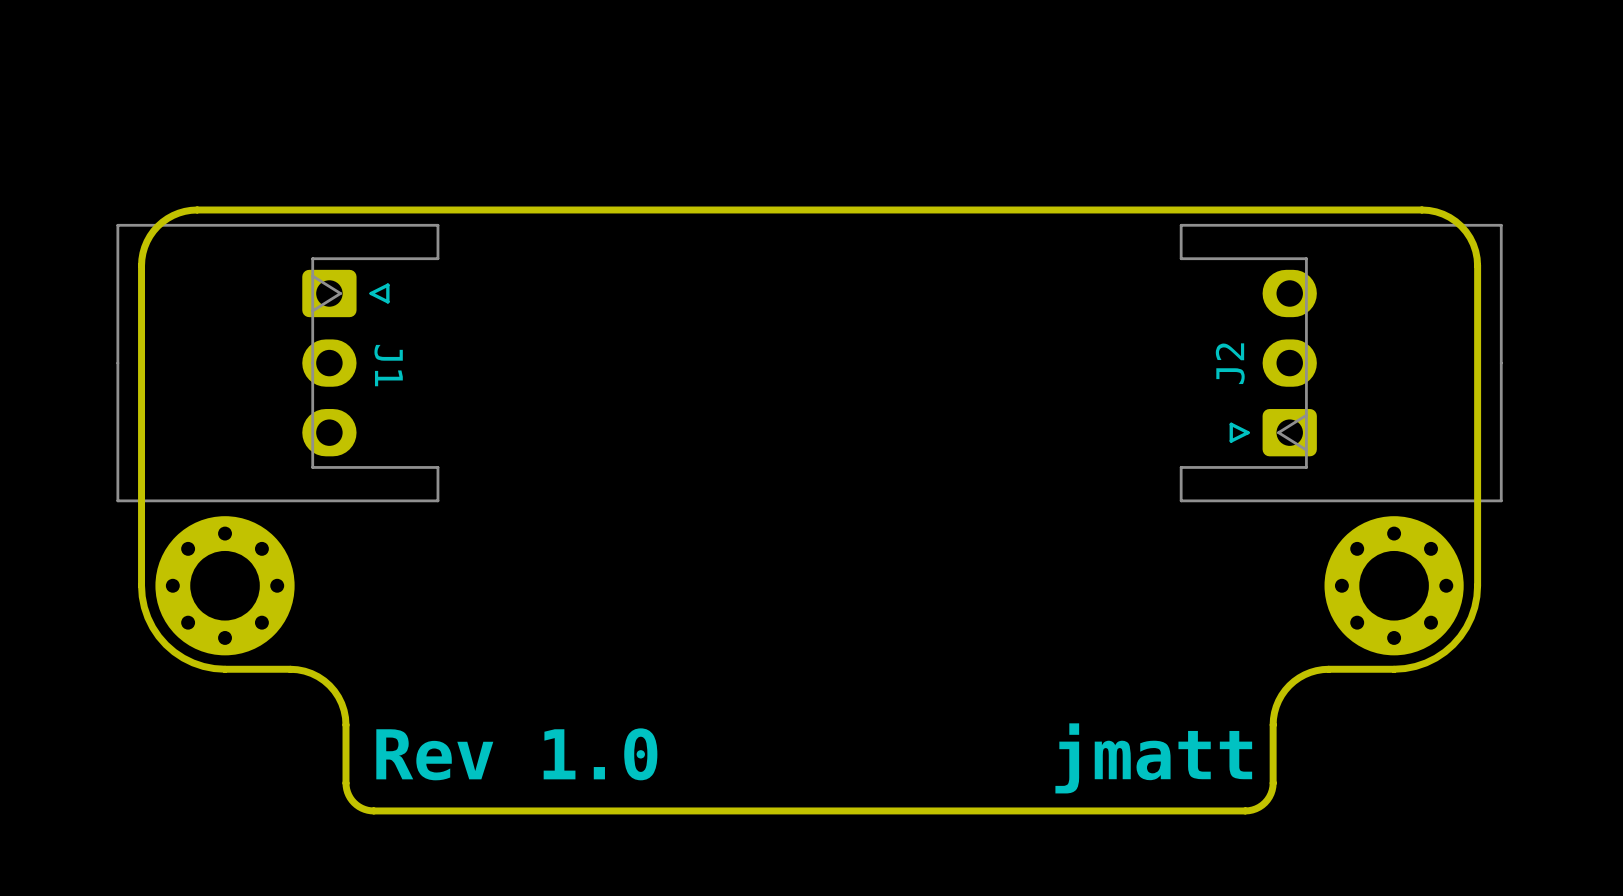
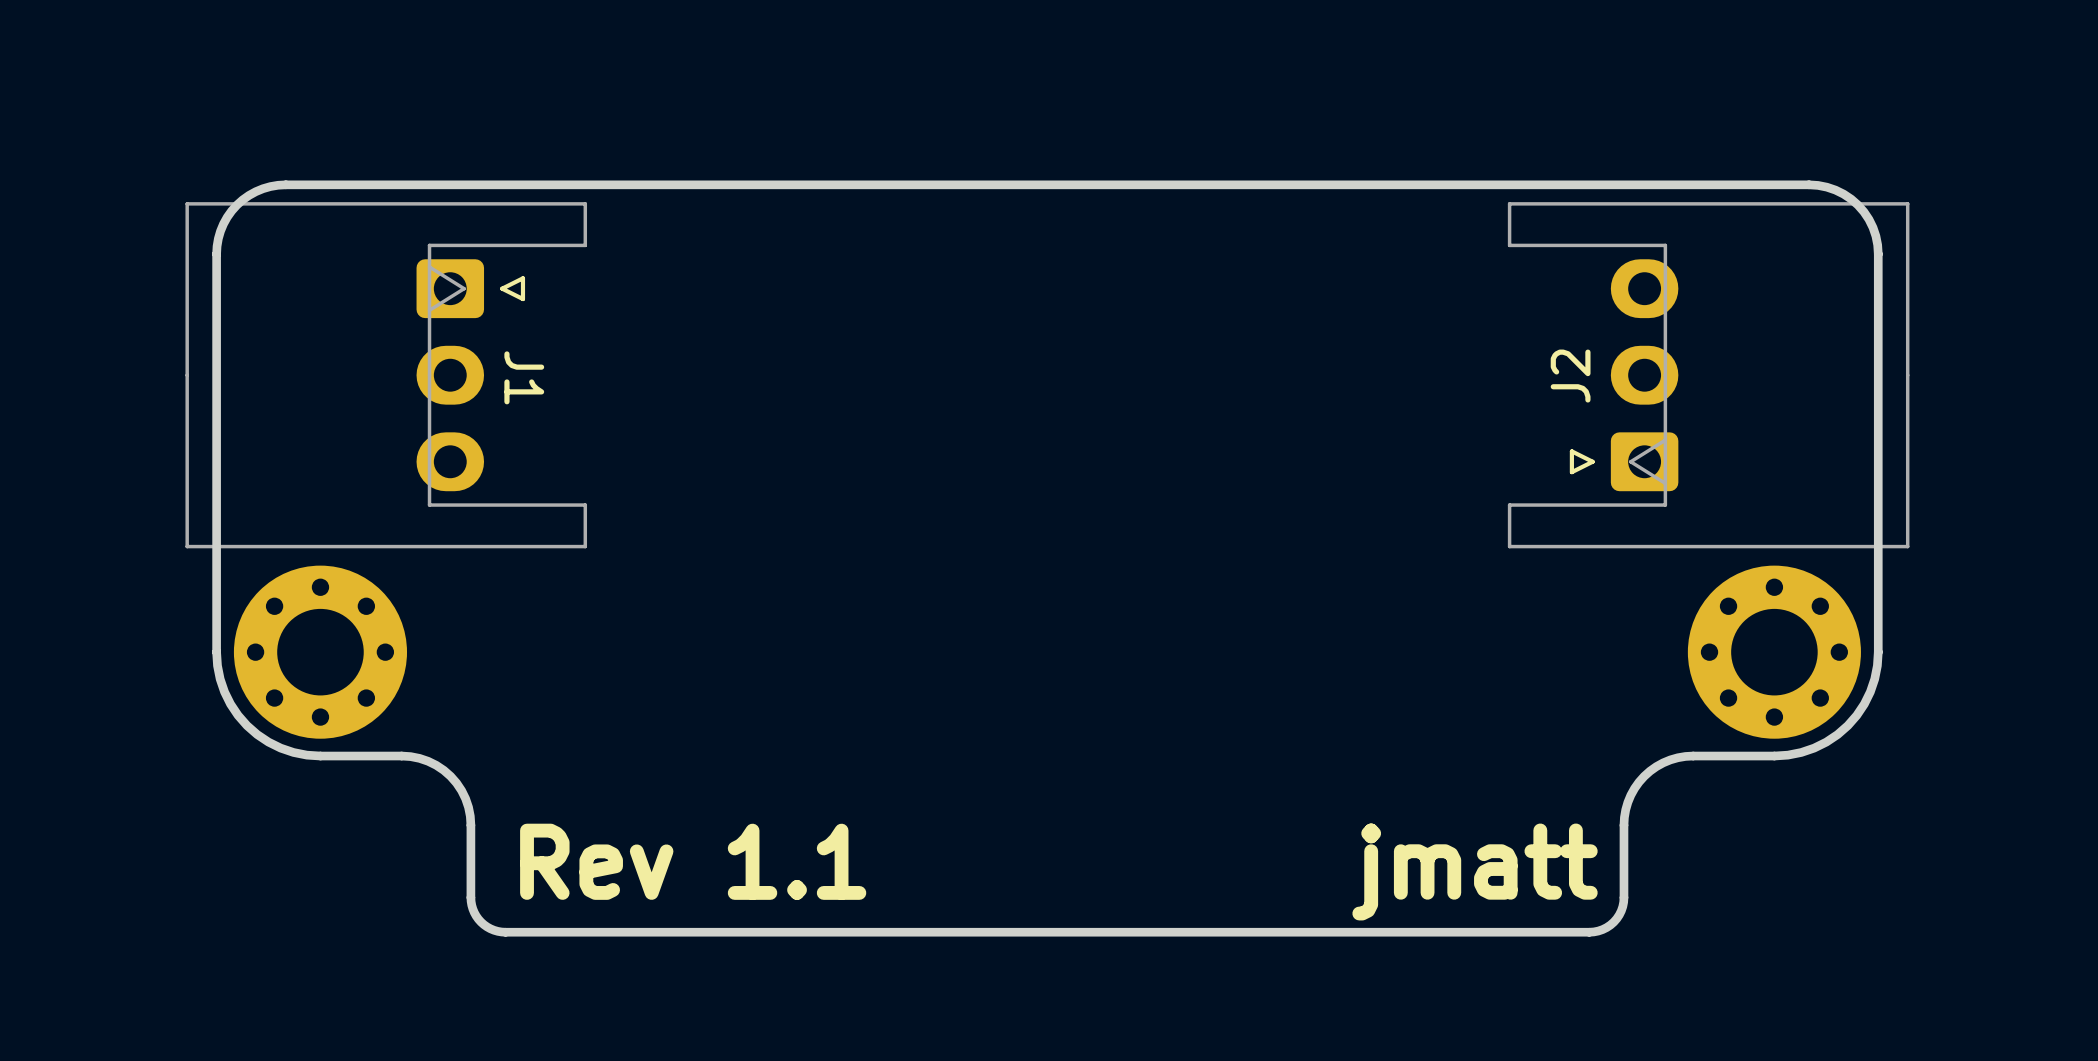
text: Rev 1.0 (516, 754) -> Rev 1.1 (693, 861)

